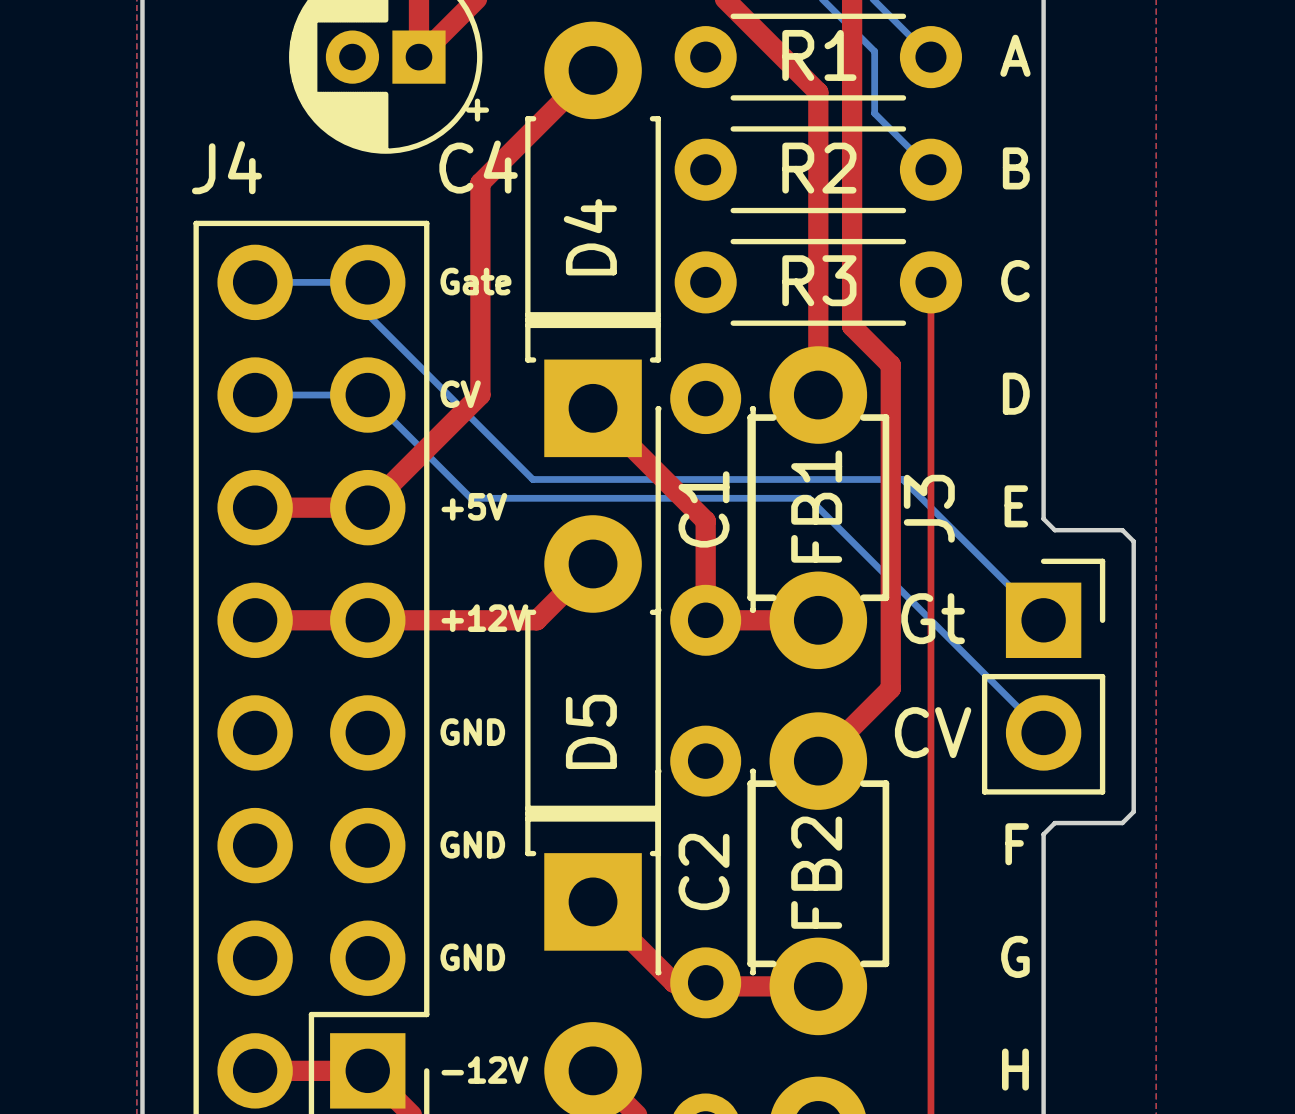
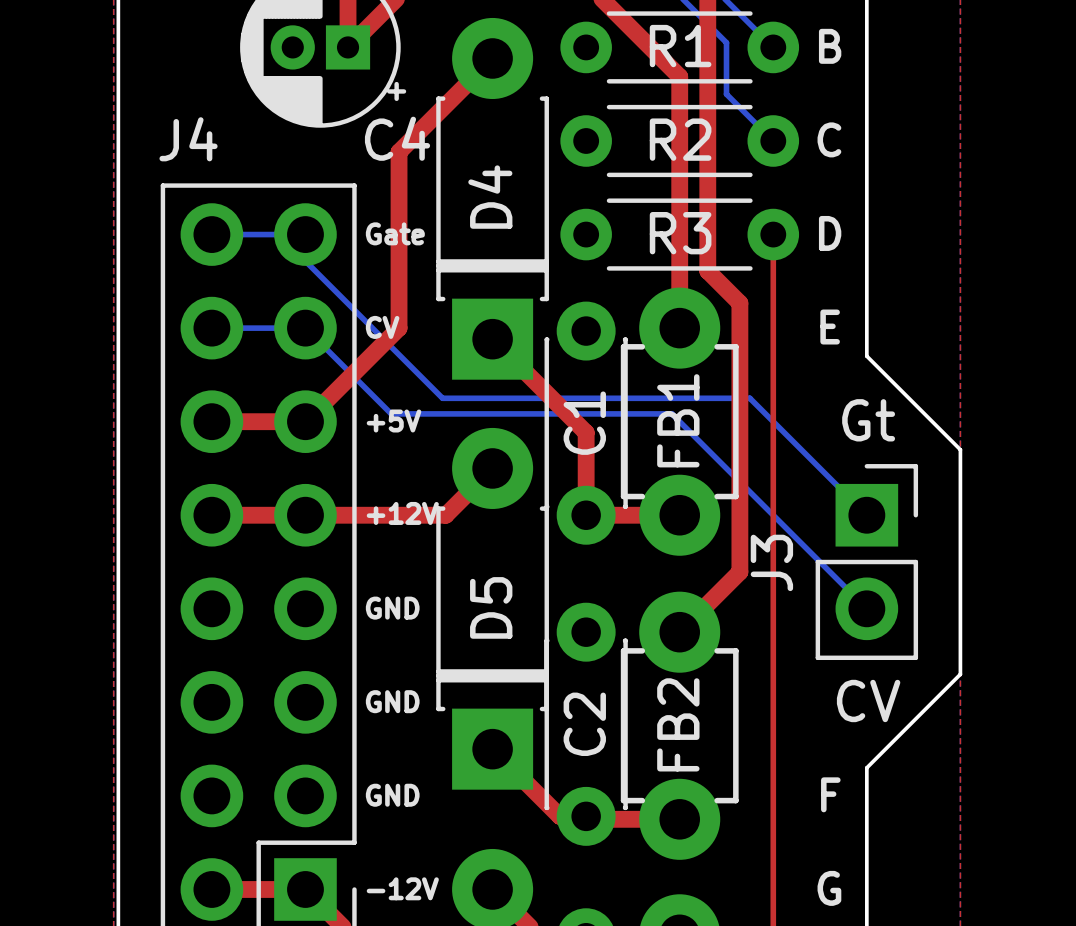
text: A (1015, 55) -> B (830, 46)
text: B (1016, 168) -> C (829, 139)
text: C (1015, 281) -> D (830, 233)
text: D (1016, 393) -> E (830, 327)
board edge: (1043, 428) (1043, 518) (1054, 530) (1122, 530) (1133, 541) (1133, 811) (1122, 823) (1054, 823) (1043, 834) (1043, 924) -> (866, 356) (960, 449) (960, 674) (866, 767)
text: E (1016, 506) -> Gt (868, 420)
J3 name position: J3 (929, 508) -> J3 (771, 562)
text: Gt (933, 618) -> none
text: CV (933, 732) -> none
text: F (1017, 844) -> CV (868, 700)
text: G (1015, 956) -> F (830, 794)
text: H (1015, 1069) -> G (829, 888)

